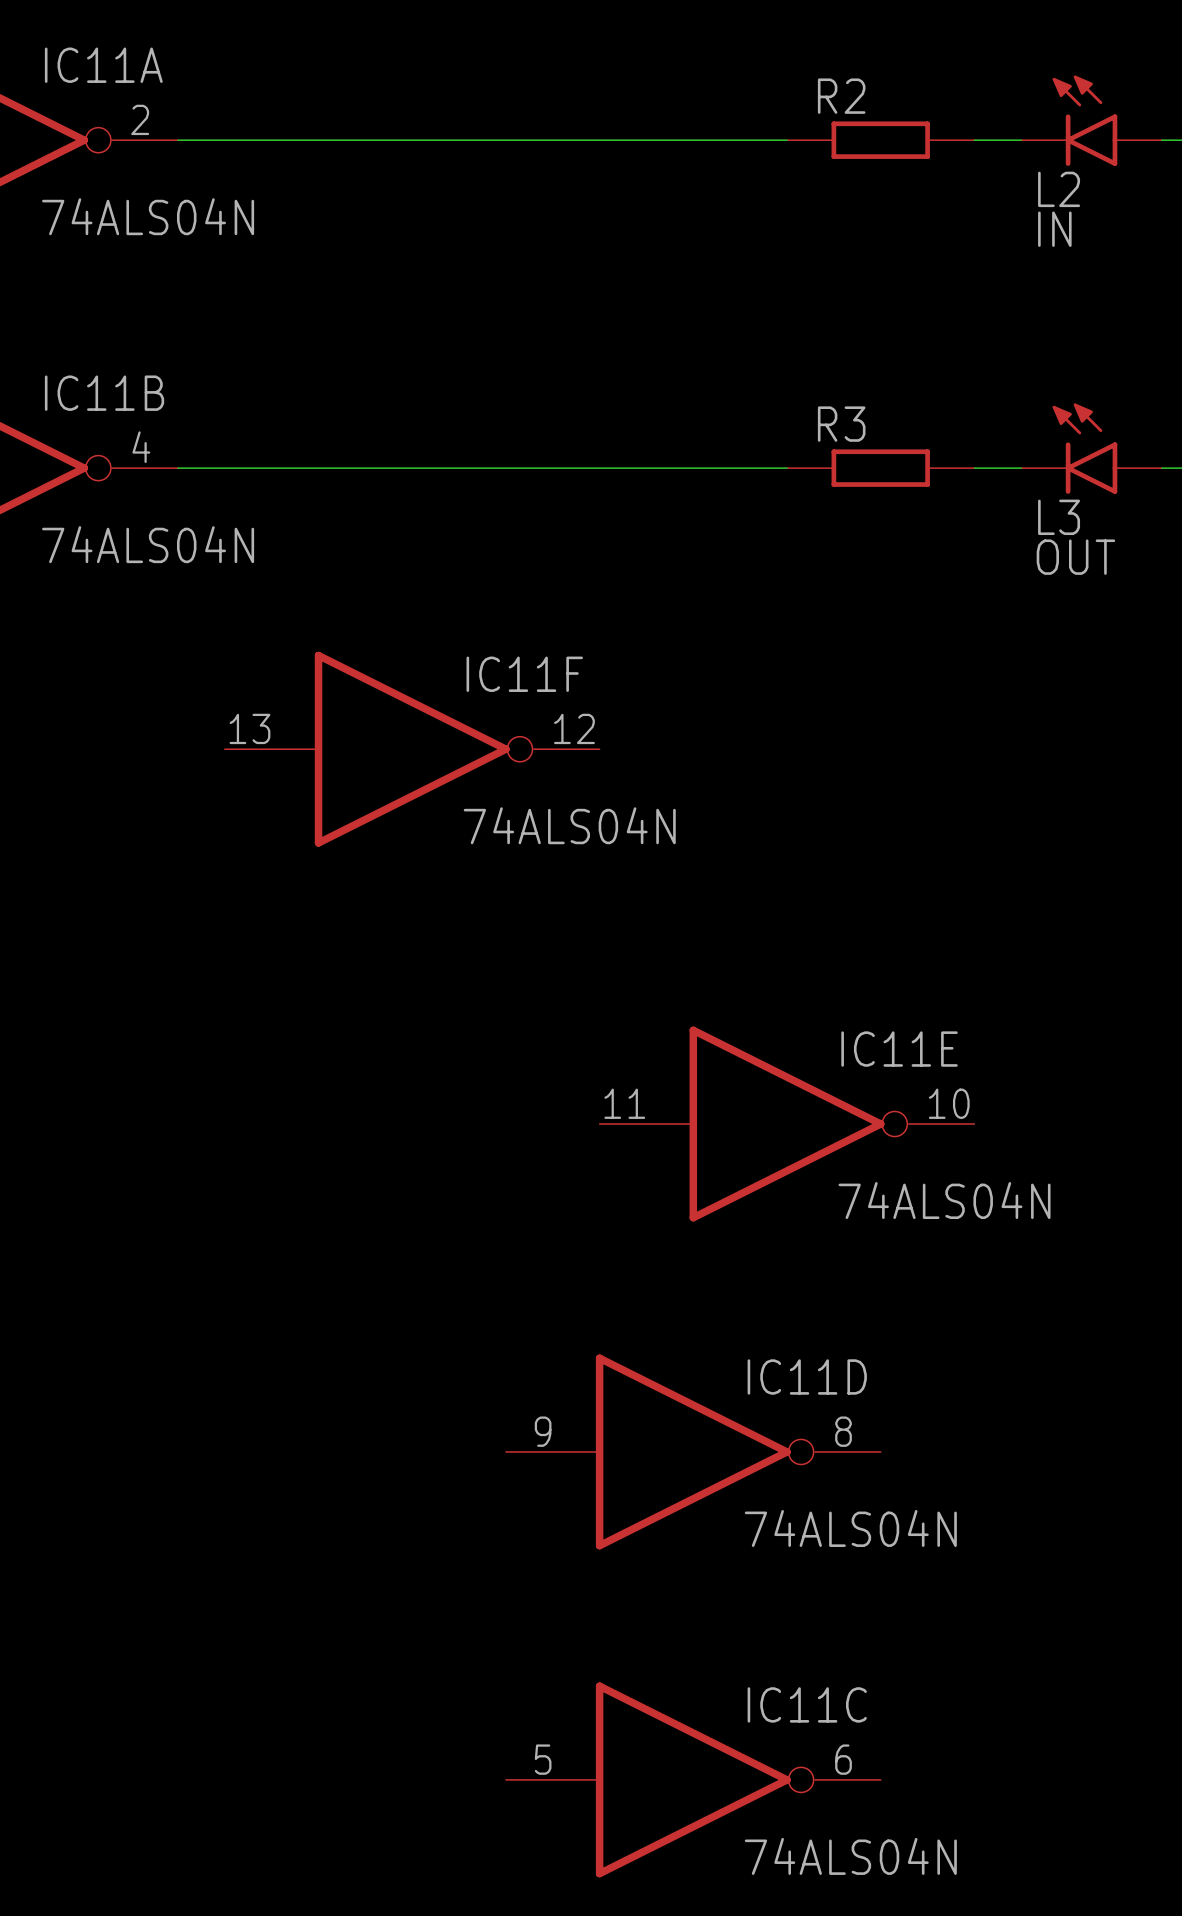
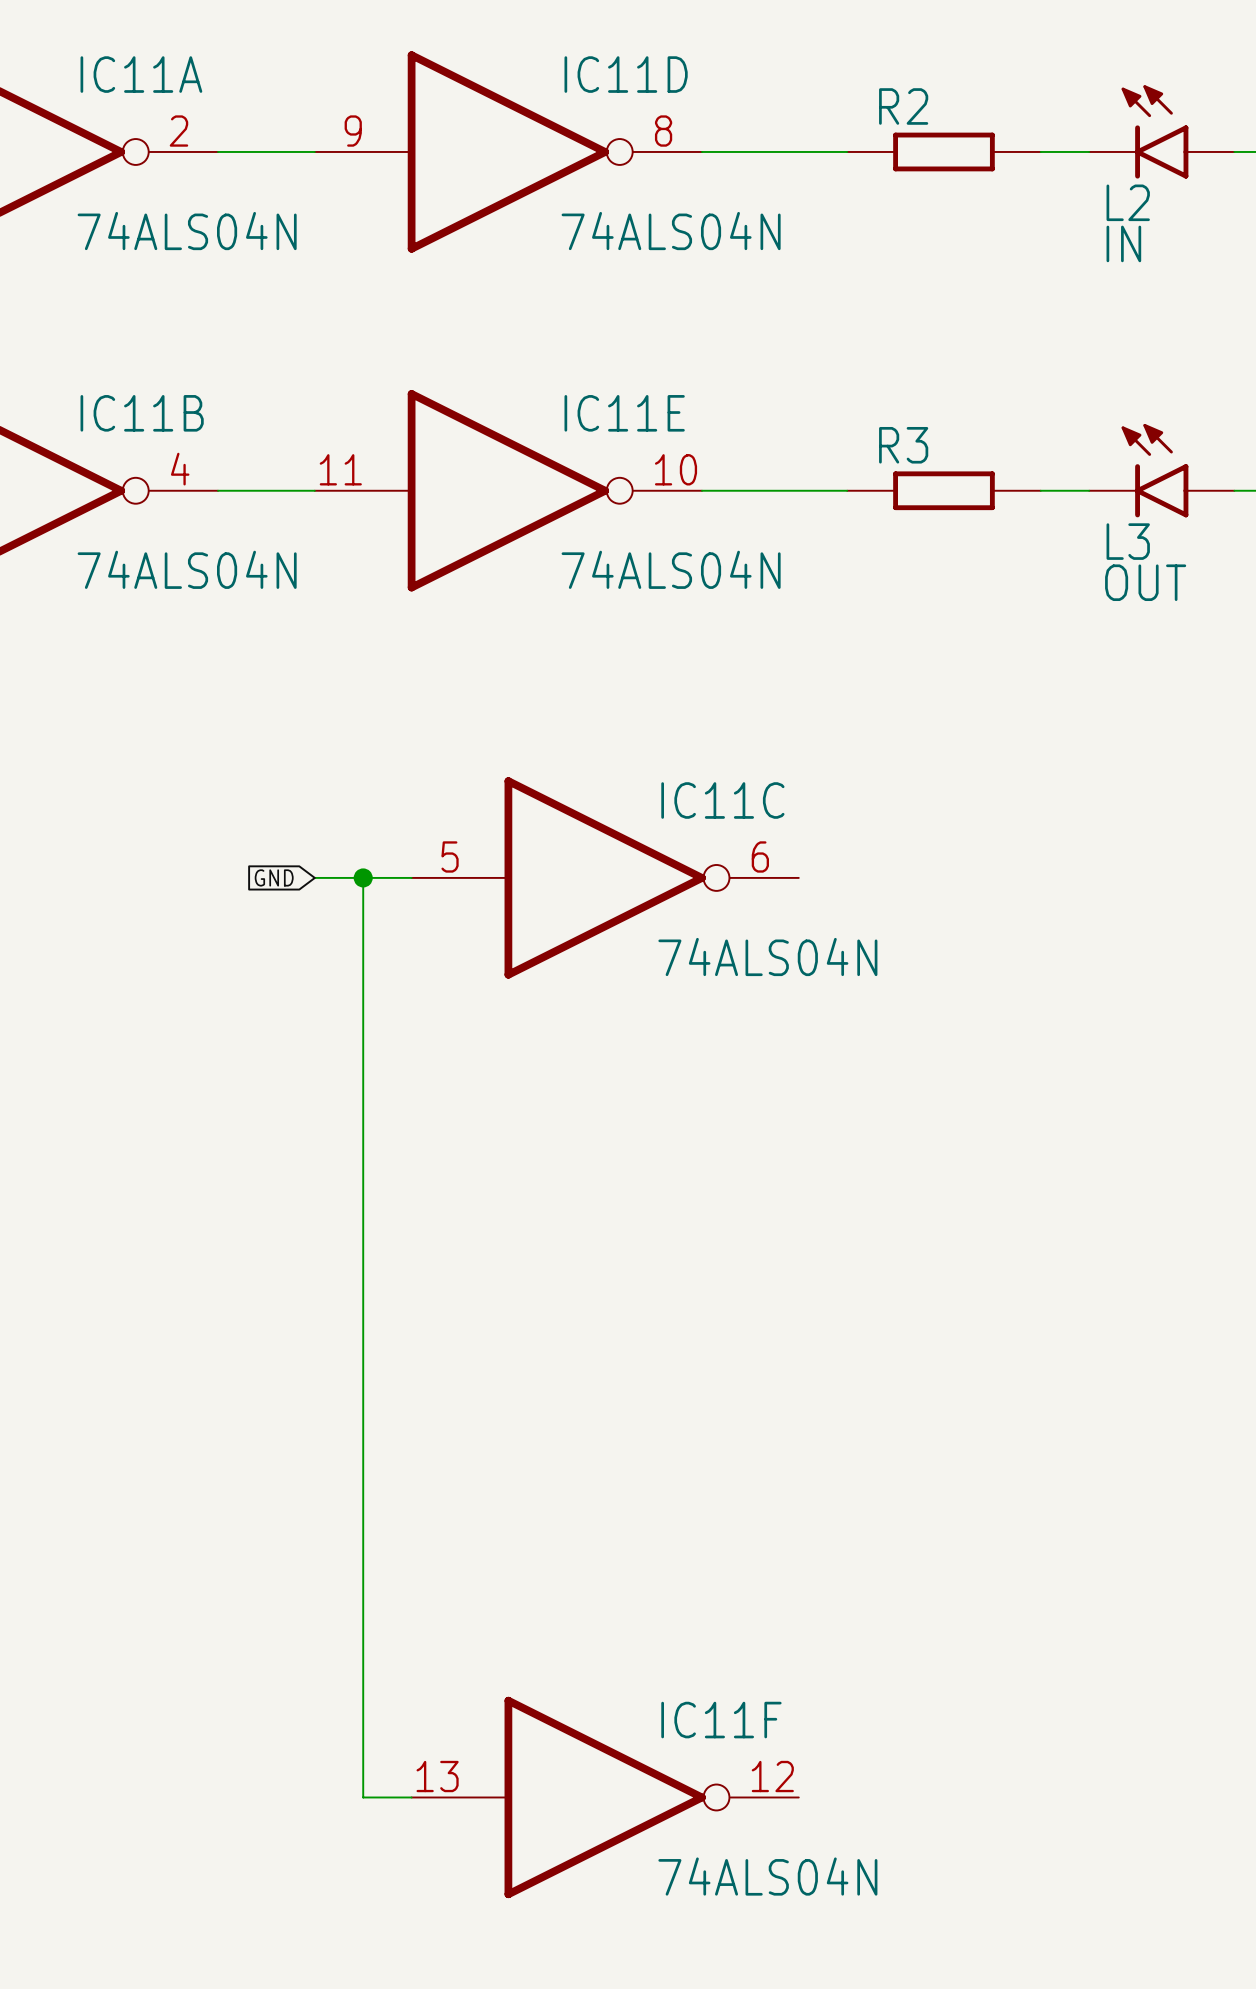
wire: (271, 140) (646, 140) -> none
wire: (271, 468) (646, 468) -> none
IC11F position: (412, 749) -> (605, 1797)
global label: none -> GND (274, 877)
wire: none -> (314, 877) (411, 877)
wire: none -> (363, 877) (363, 1797) (411, 1797)
junction: none -> (363, 877)
IC11E position: (787, 1124) -> (508, 490)
IC11D position: (693, 1451) -> (508, 151)
IC11C position: (693, 1779) -> (605, 877)

